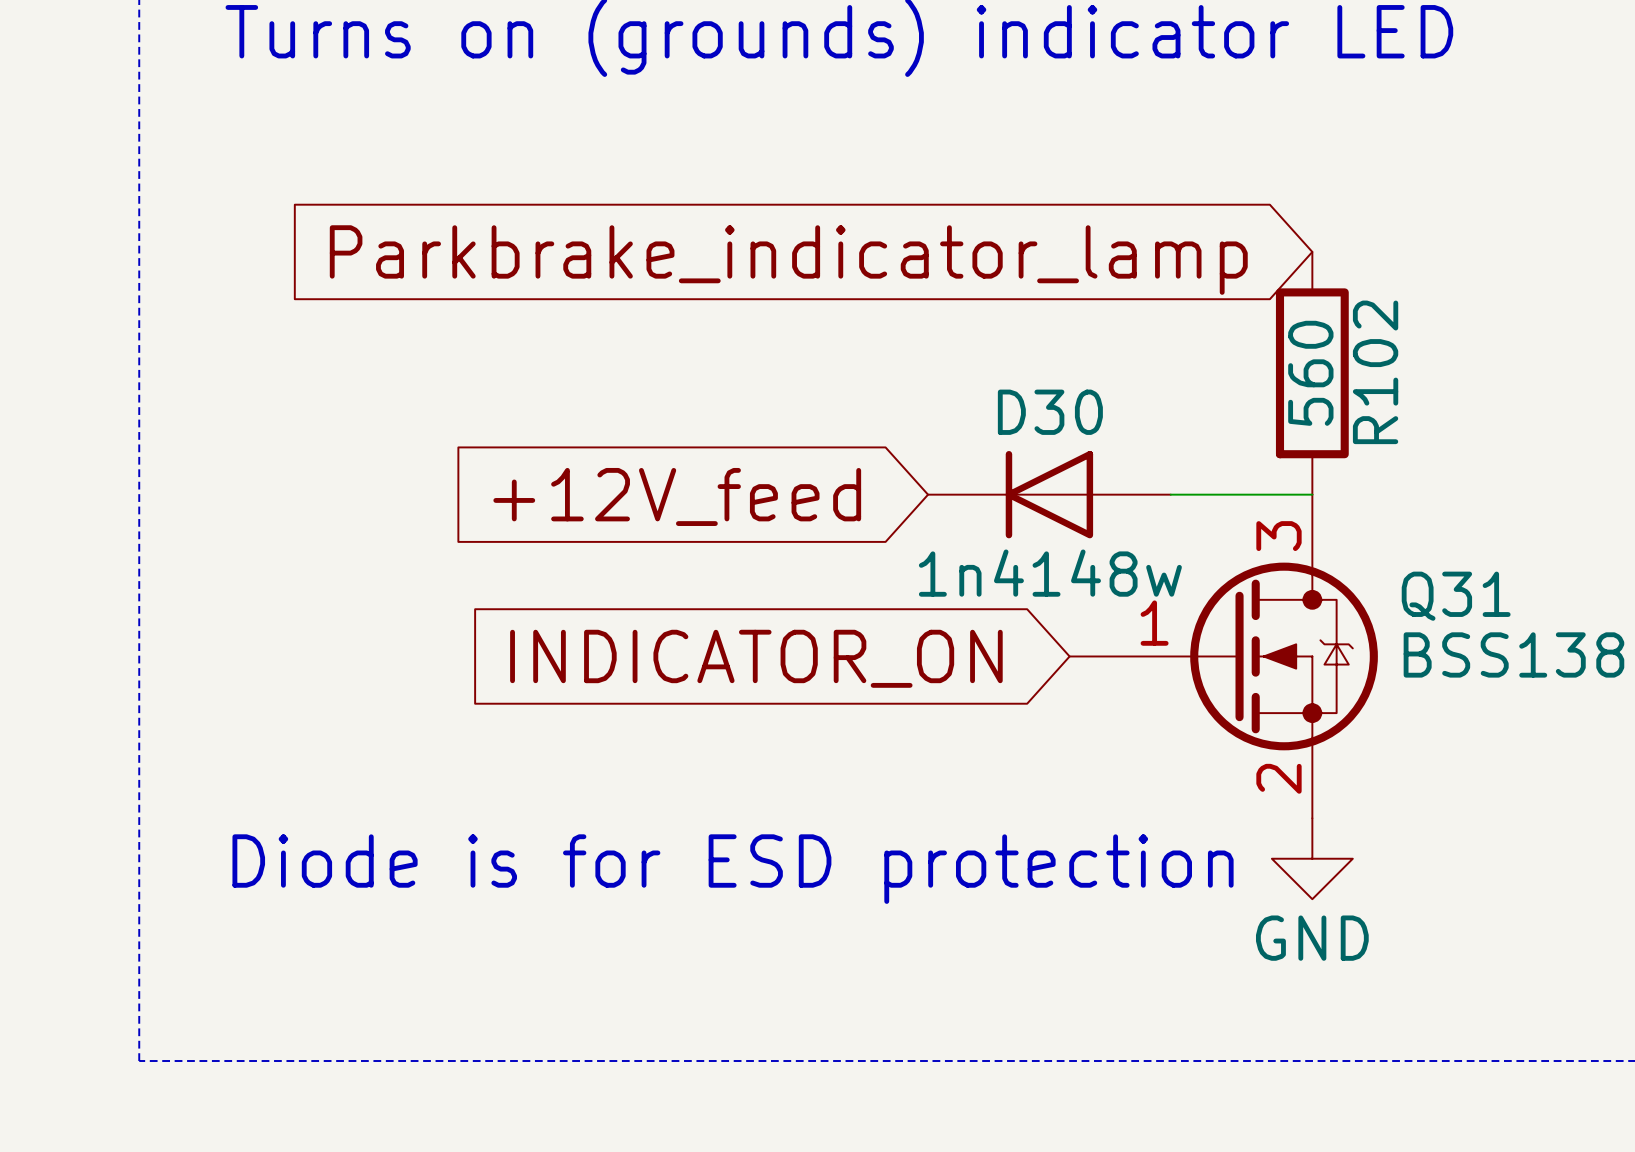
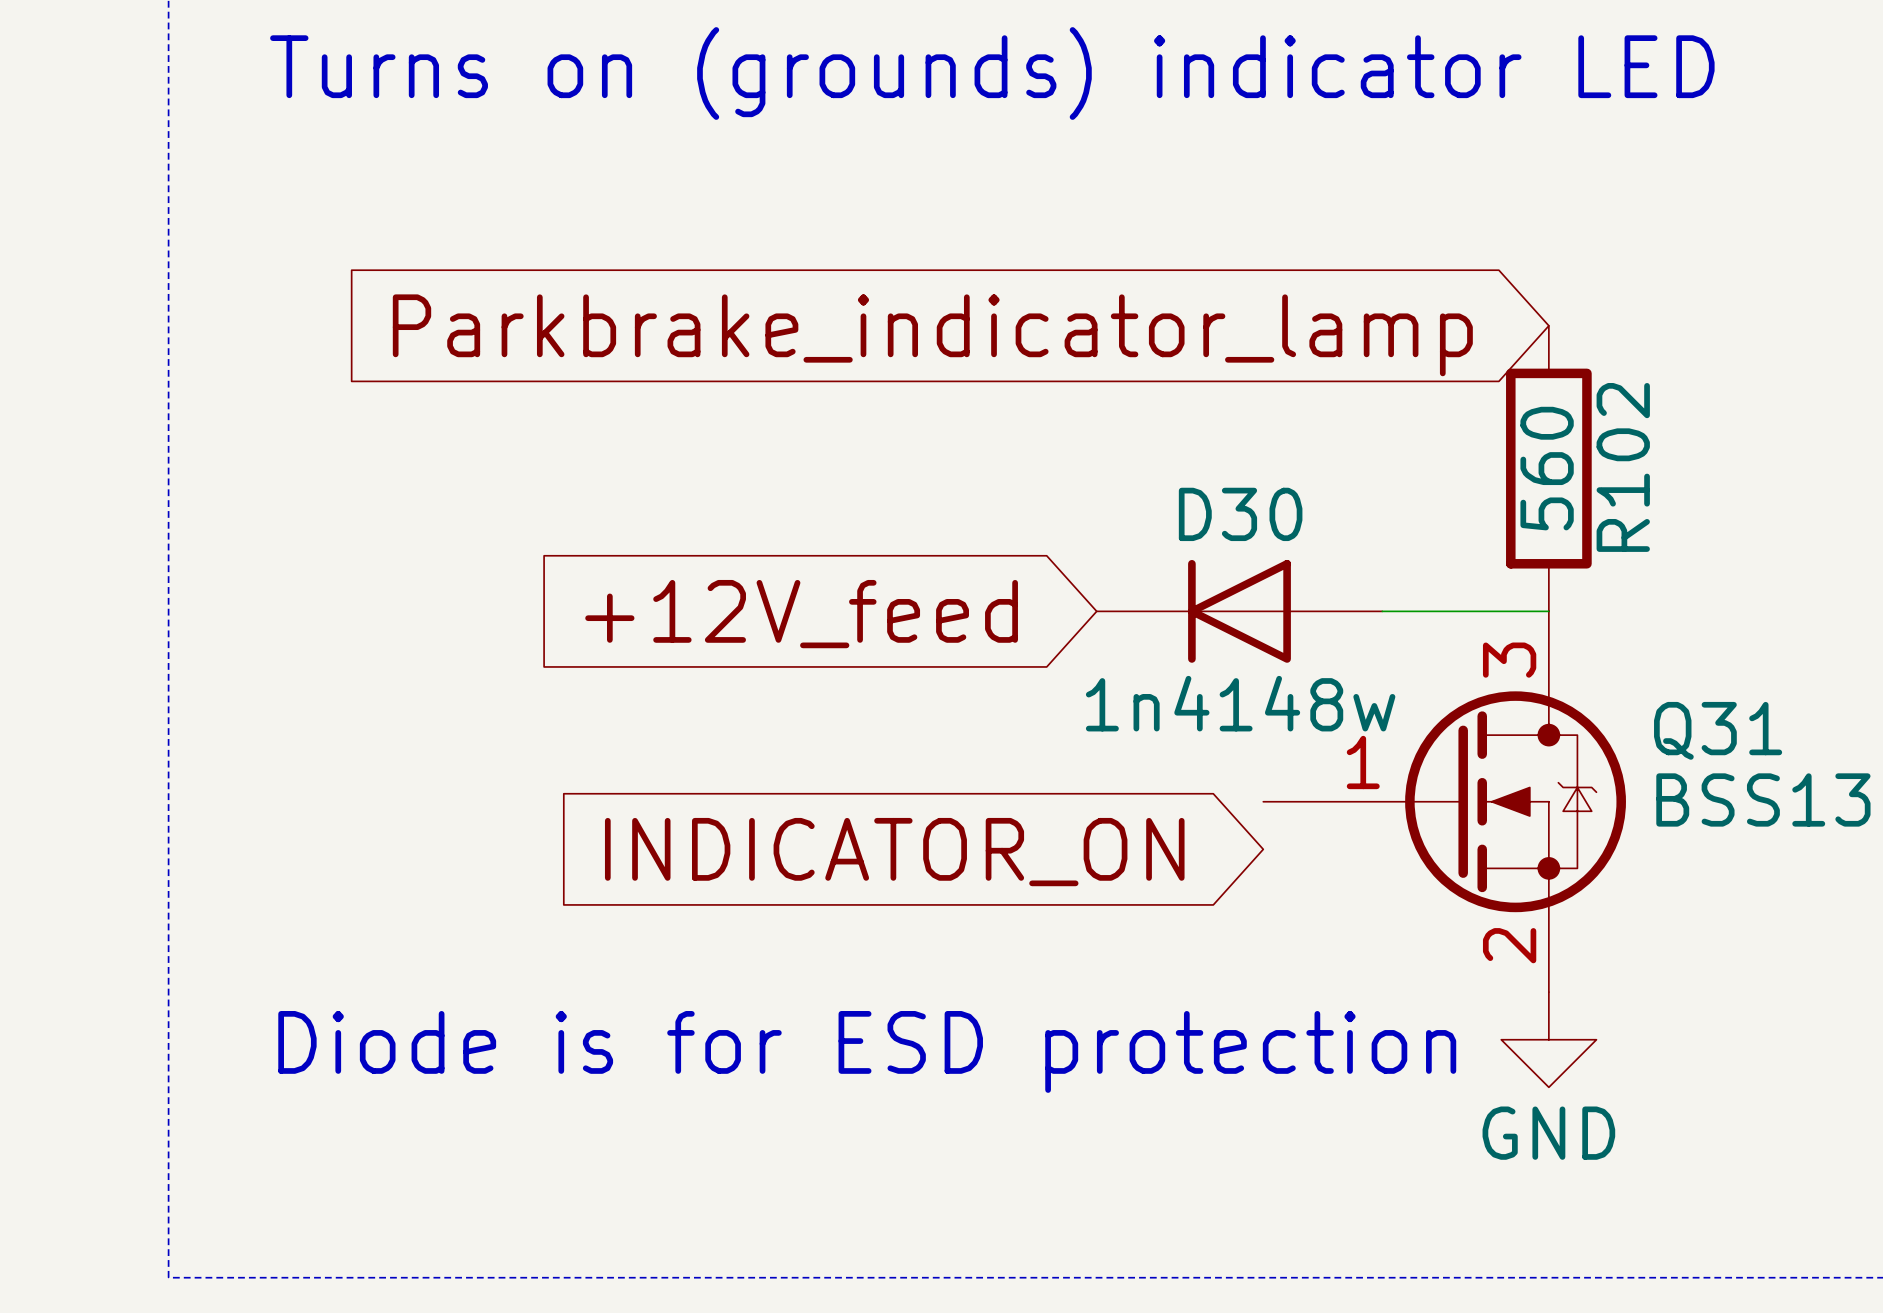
global label position: INDICATOR_ON (756, 658) -> INDICATOR_ON (894, 852)

